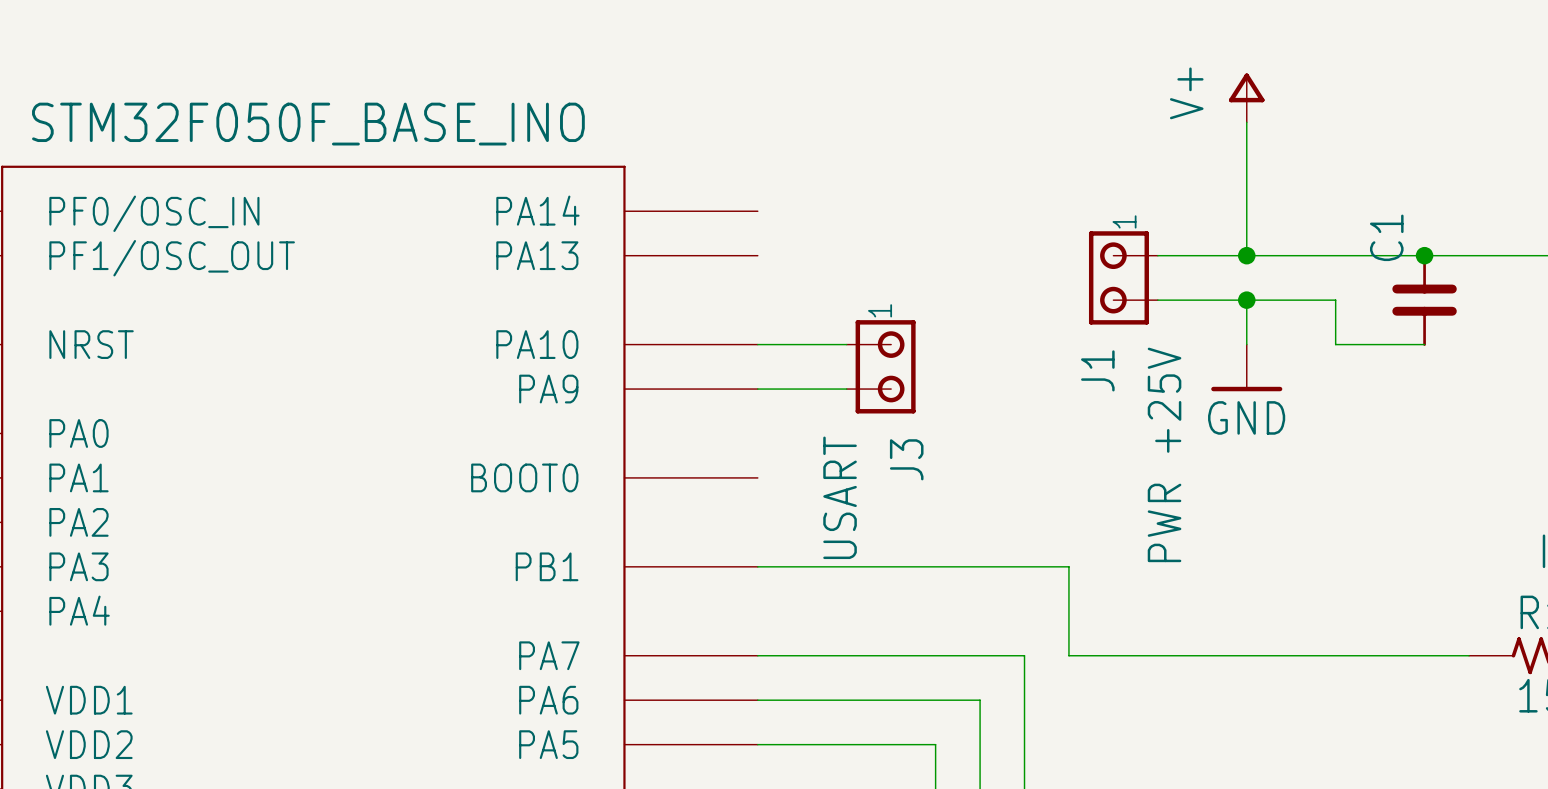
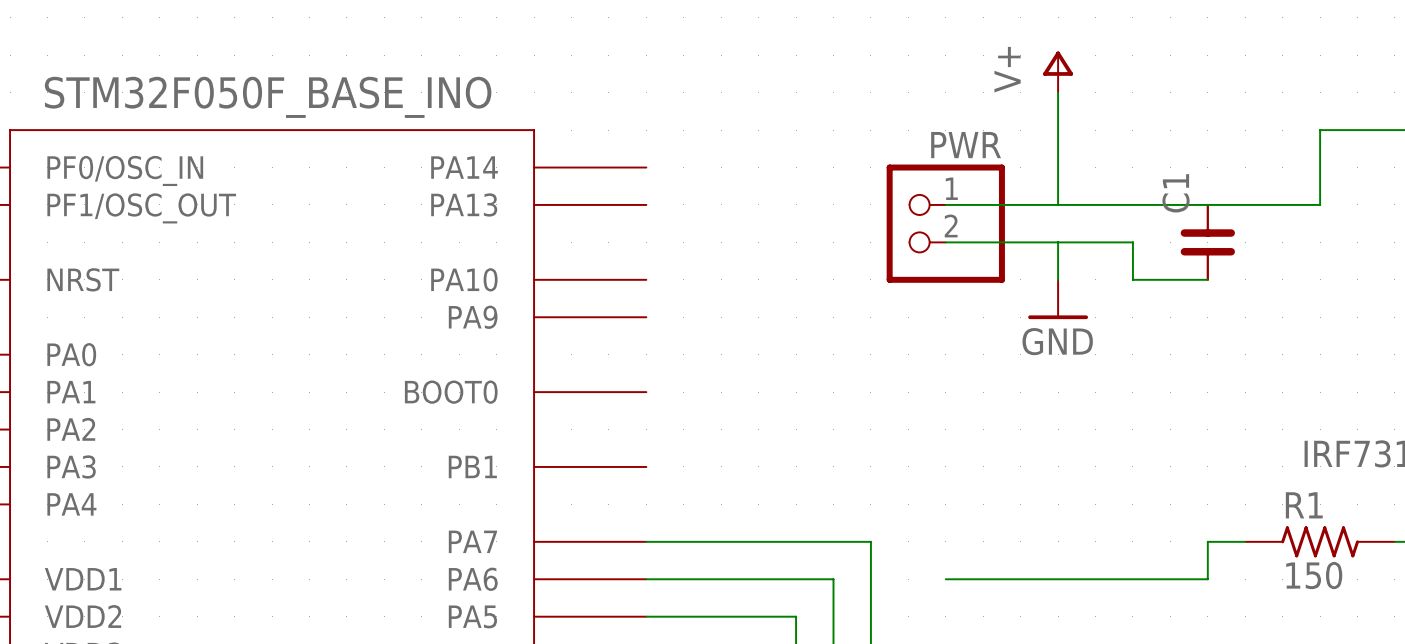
junction: (1246, 255) -> none
junction: (1424, 255) -> none
PWR: none -> (945, 223)
J1: PWR +25V (1123, 277) -> none
junction: (1246, 300) -> none
wire: (757, 344) (846, 344) -> none
J3: USART (881, 366) -> none
wire: (757, 389) (846, 389) -> none
wire: (757, 566) (1068, 566) (1068, 655) (1424, 655) -> (945, 579) (1207, 579) (1207, 541)

